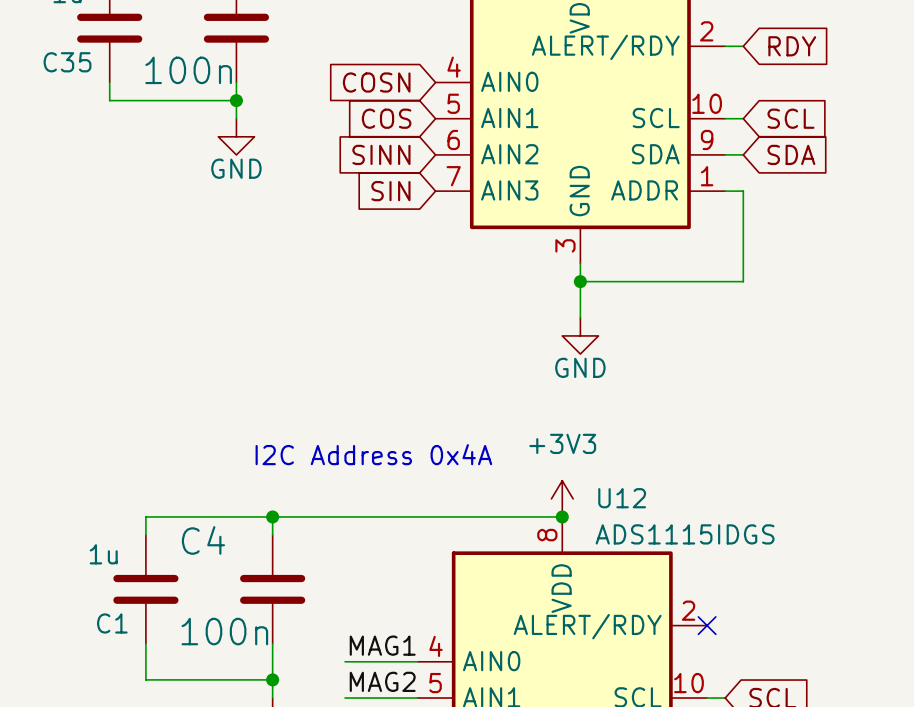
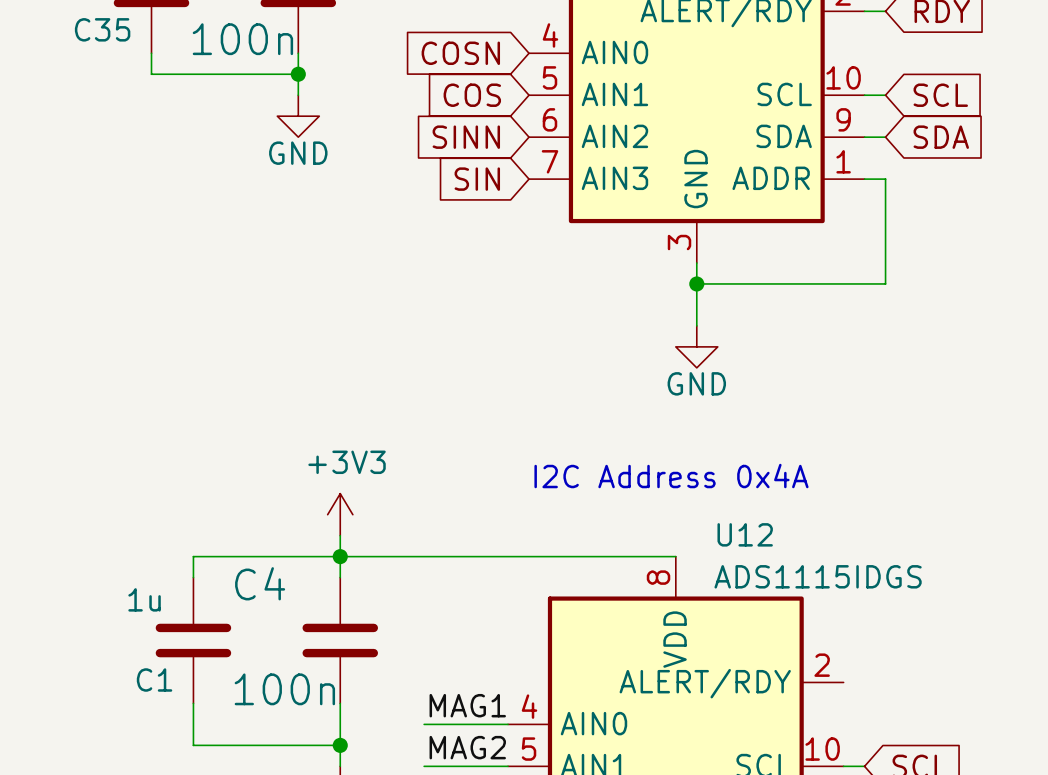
power symbol text position: +3V3 (562, 443) -> +3V3 (347, 462)
text position: I2C Address 0x4A (373, 454) -> I2C Address 0x4A (671, 476)
wire: none -> (340, 535) (340, 556)
power symbol position: +3V3 (562, 498) -> +3V3 (340, 514)
junction: (562, 516) -> none
no-connect mark: (707, 625) -> none

